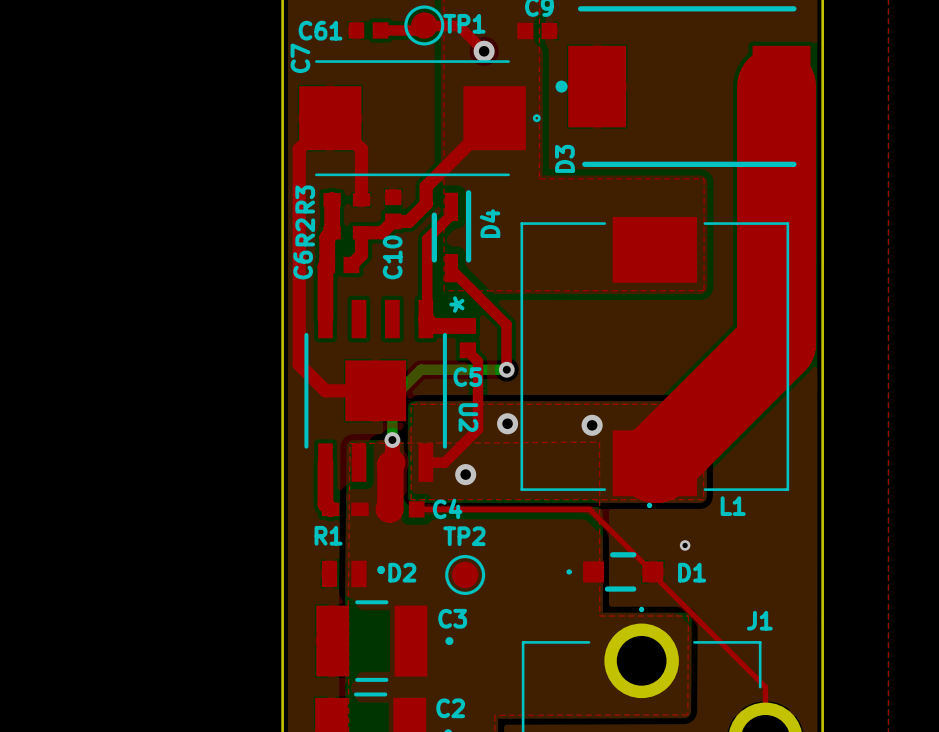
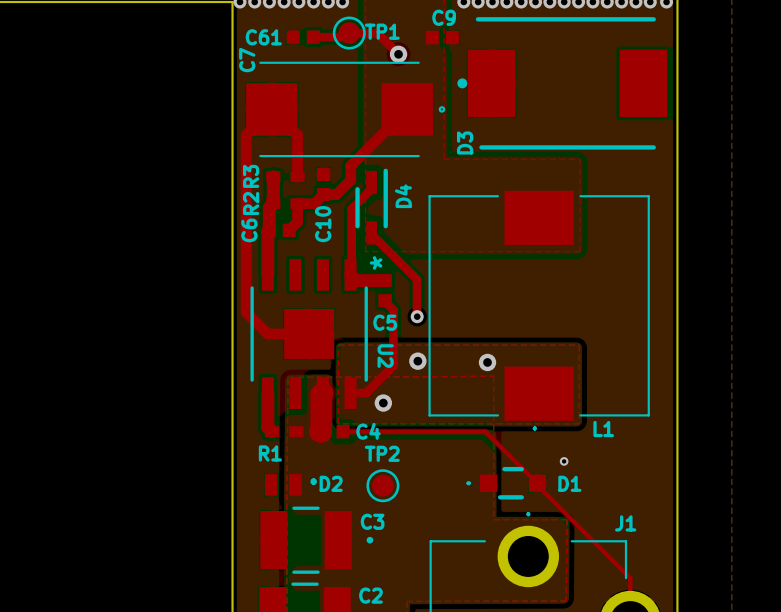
top track: (776, 86) (776, 343) (654, 463) -> none
bottom track: (506, 369) (420, 369) (392, 398) (392, 440) -> none
via: (392, 440) -> none

